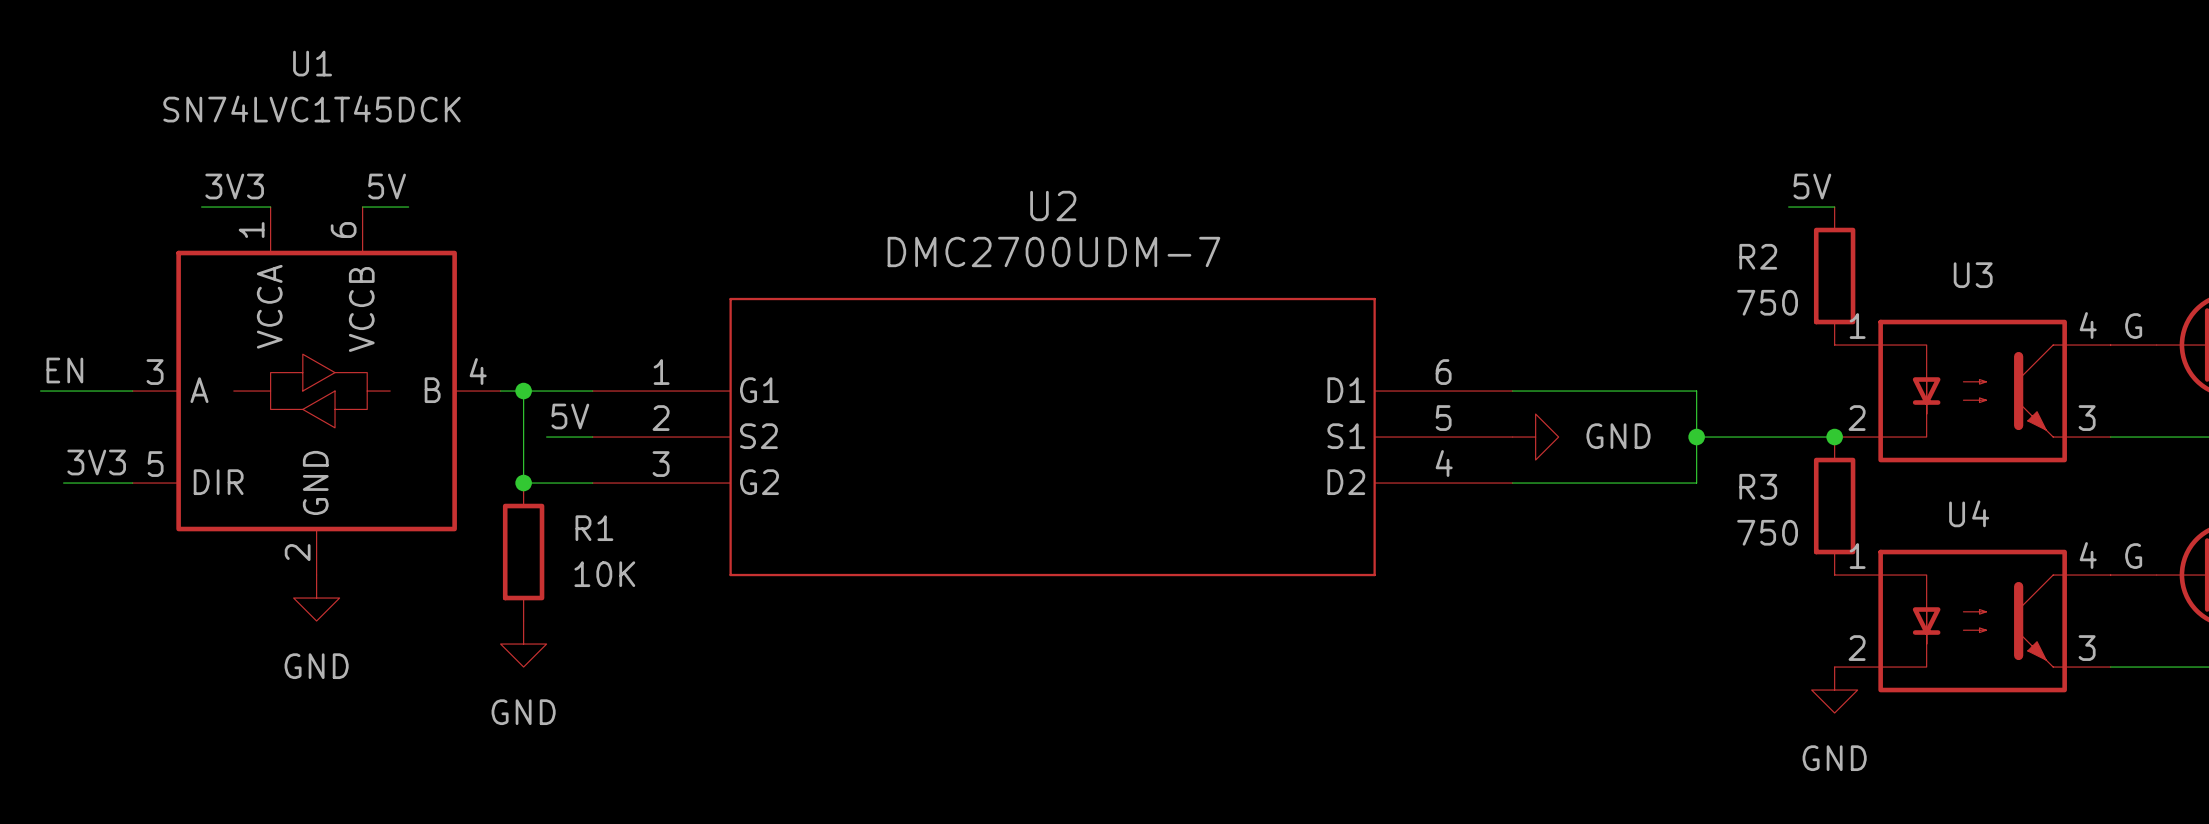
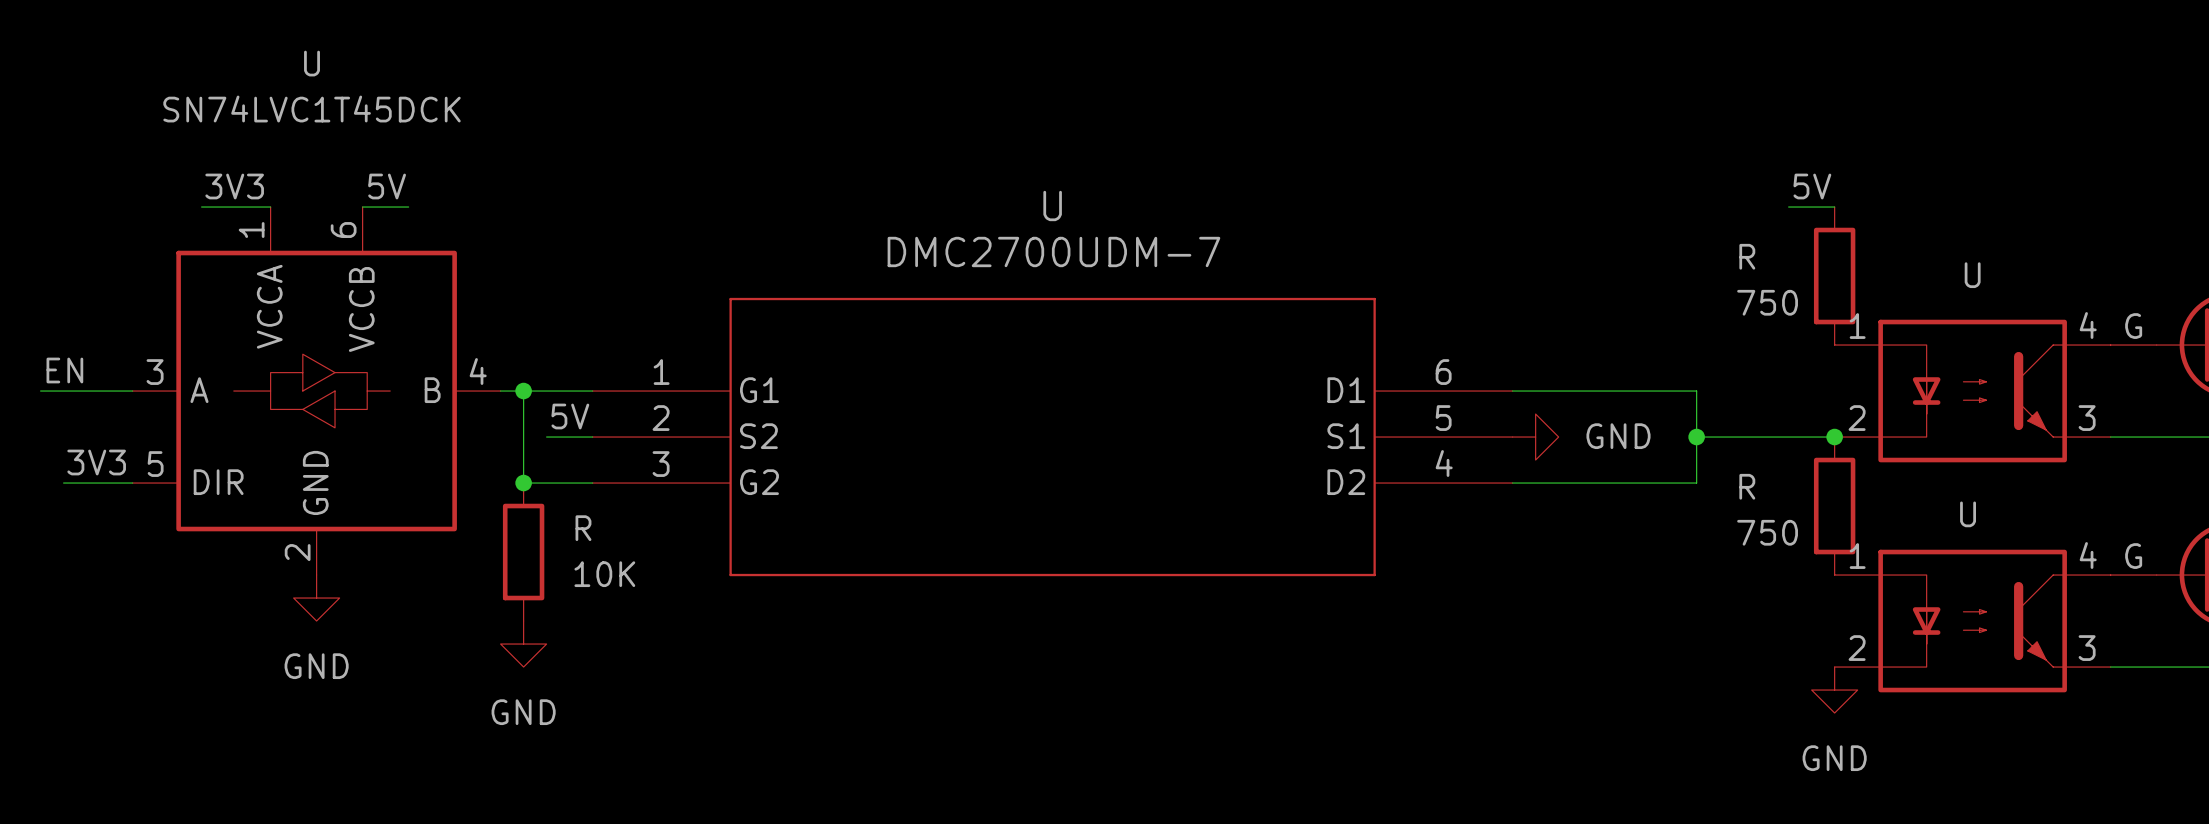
U1 name: U1 (312, 63) -> U (312, 63)
U2 name: U2 (1053, 205) -> U (1052, 205)
R2 name: R2 (1758, 256) -> R (1747, 256)
U3 name: U3 (1973, 275) -> U (1972, 275)
R3 name: R3 (1758, 486) -> R (1747, 486)
U4 name: U4 (1969, 513) -> U (1968, 514)
R1 name: R1 (594, 528) -> R (583, 528)

